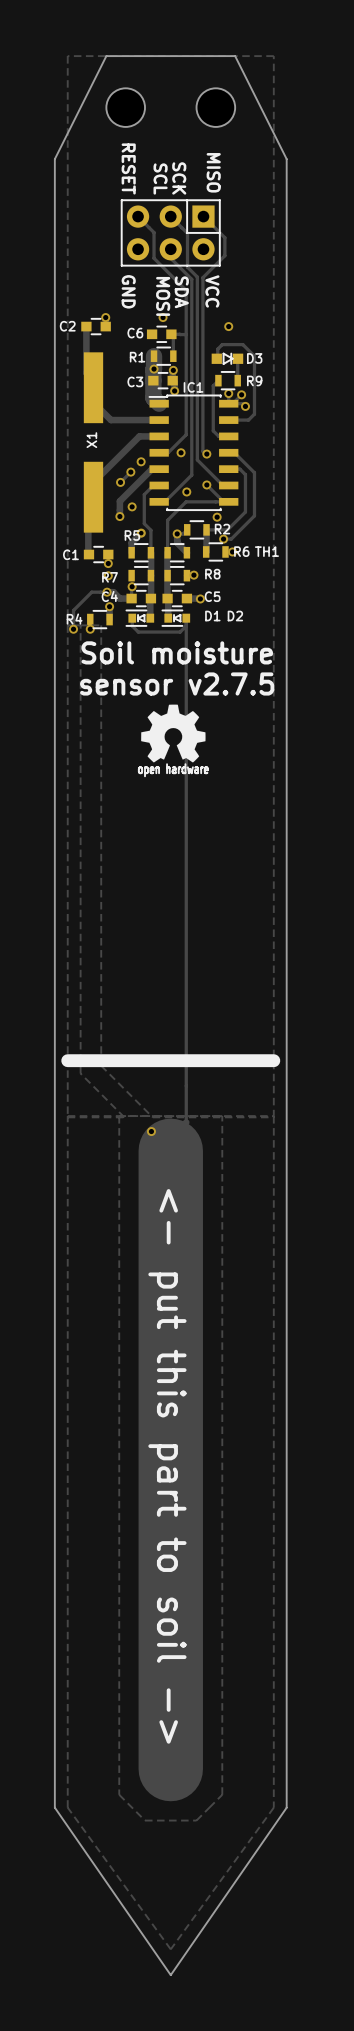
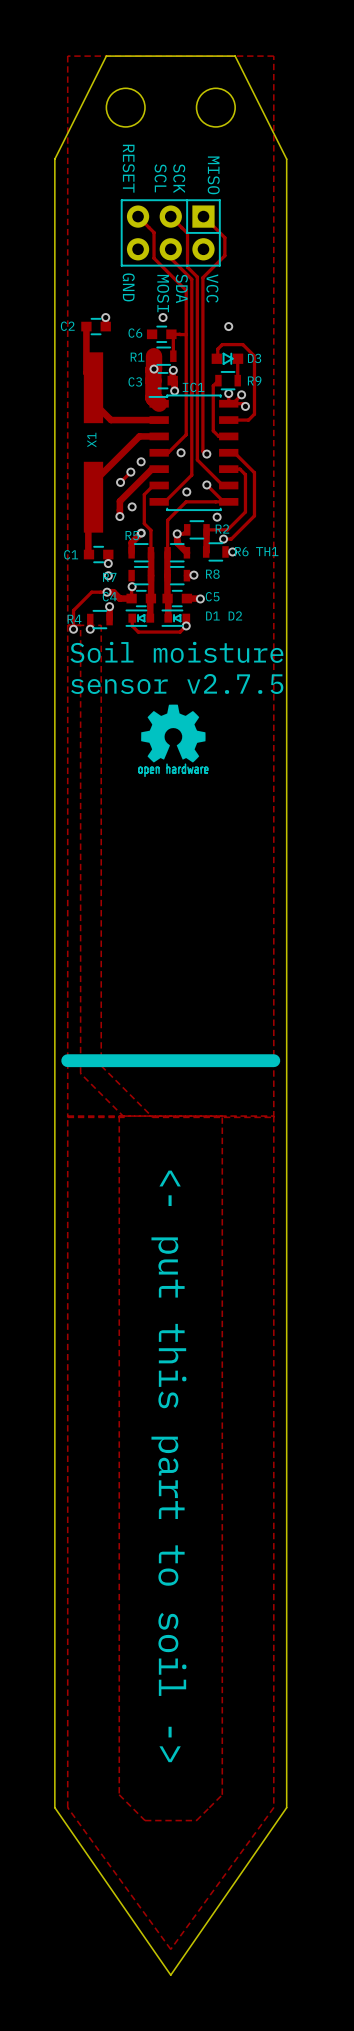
track: (186, 625) (186, 1122) (157, 1150) -> none
via: none -> (186, 625)
via: (151, 1131) -> none
track: (170, 1150) (170, 1769) -> none

